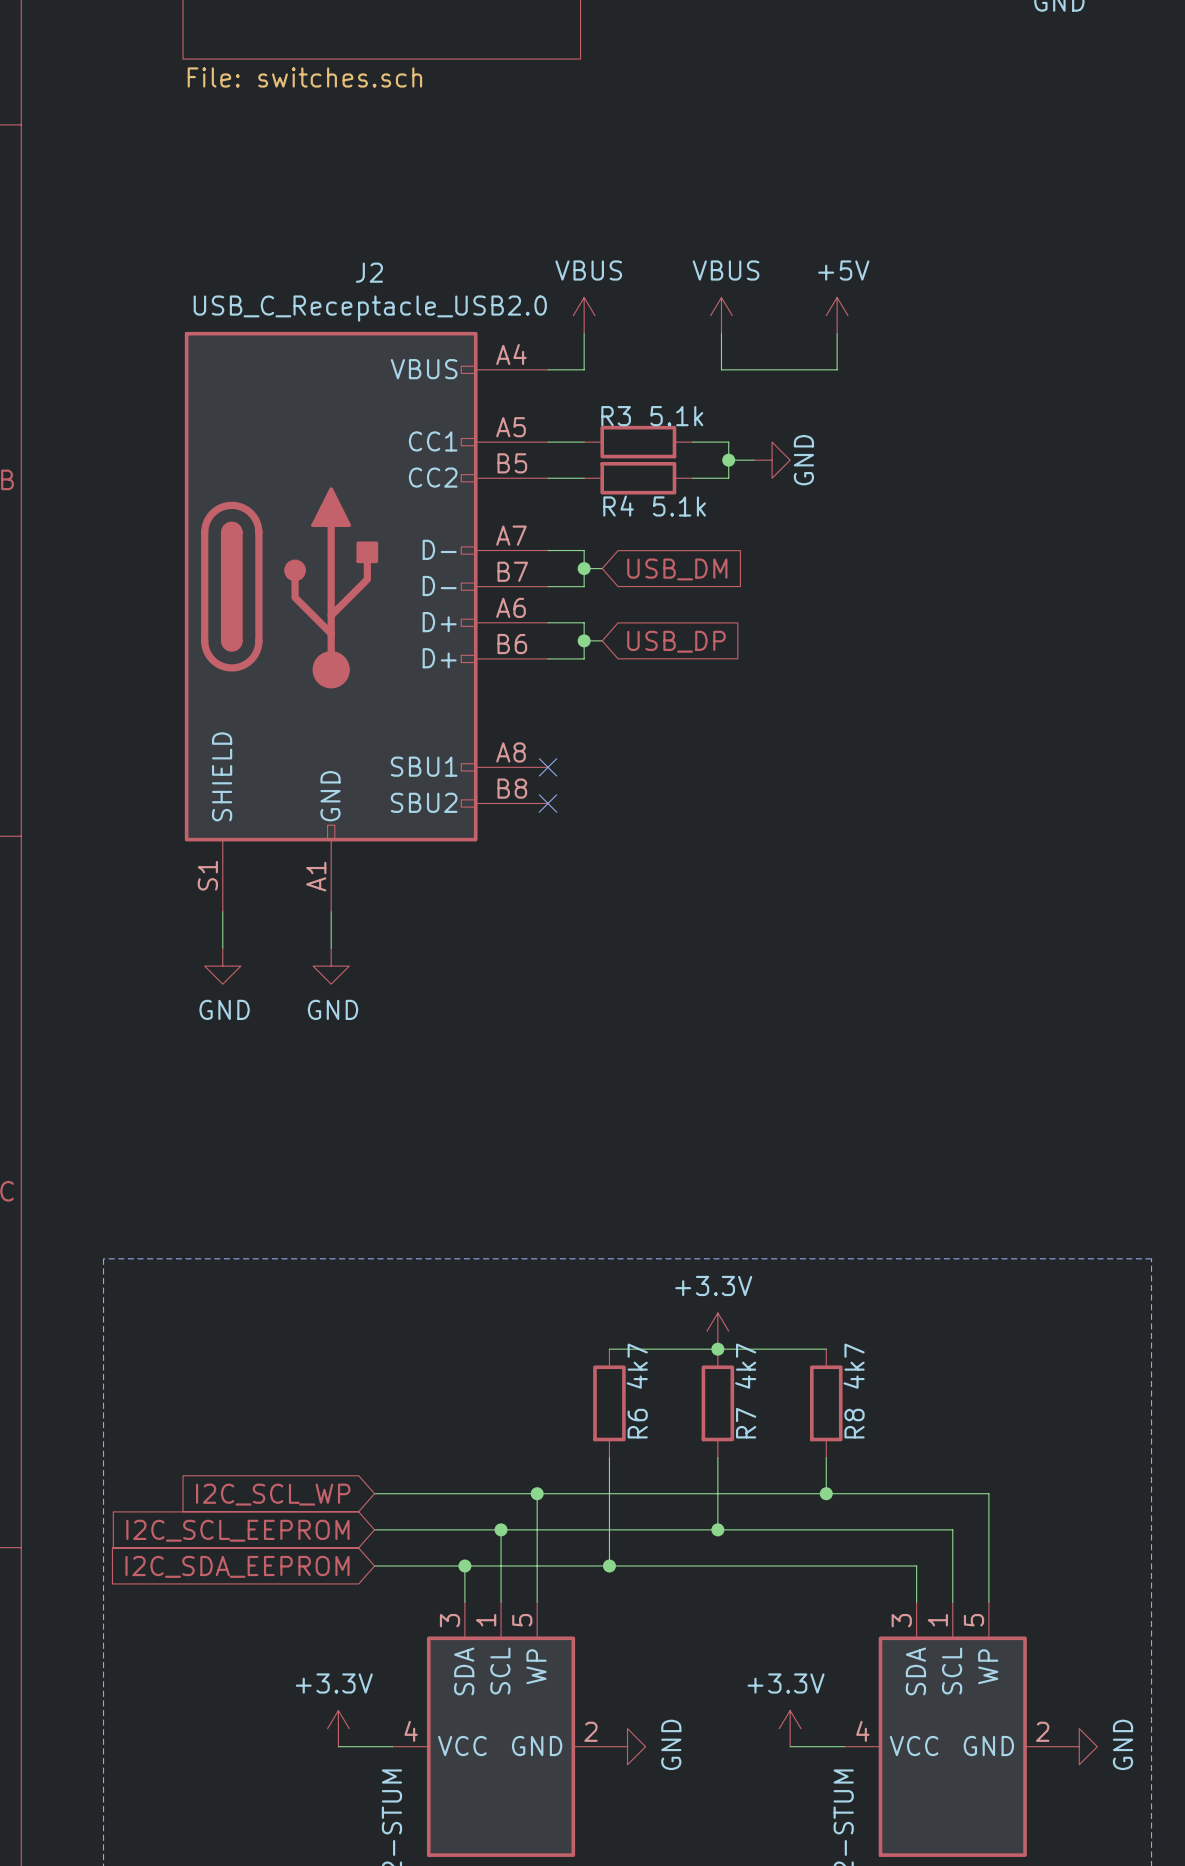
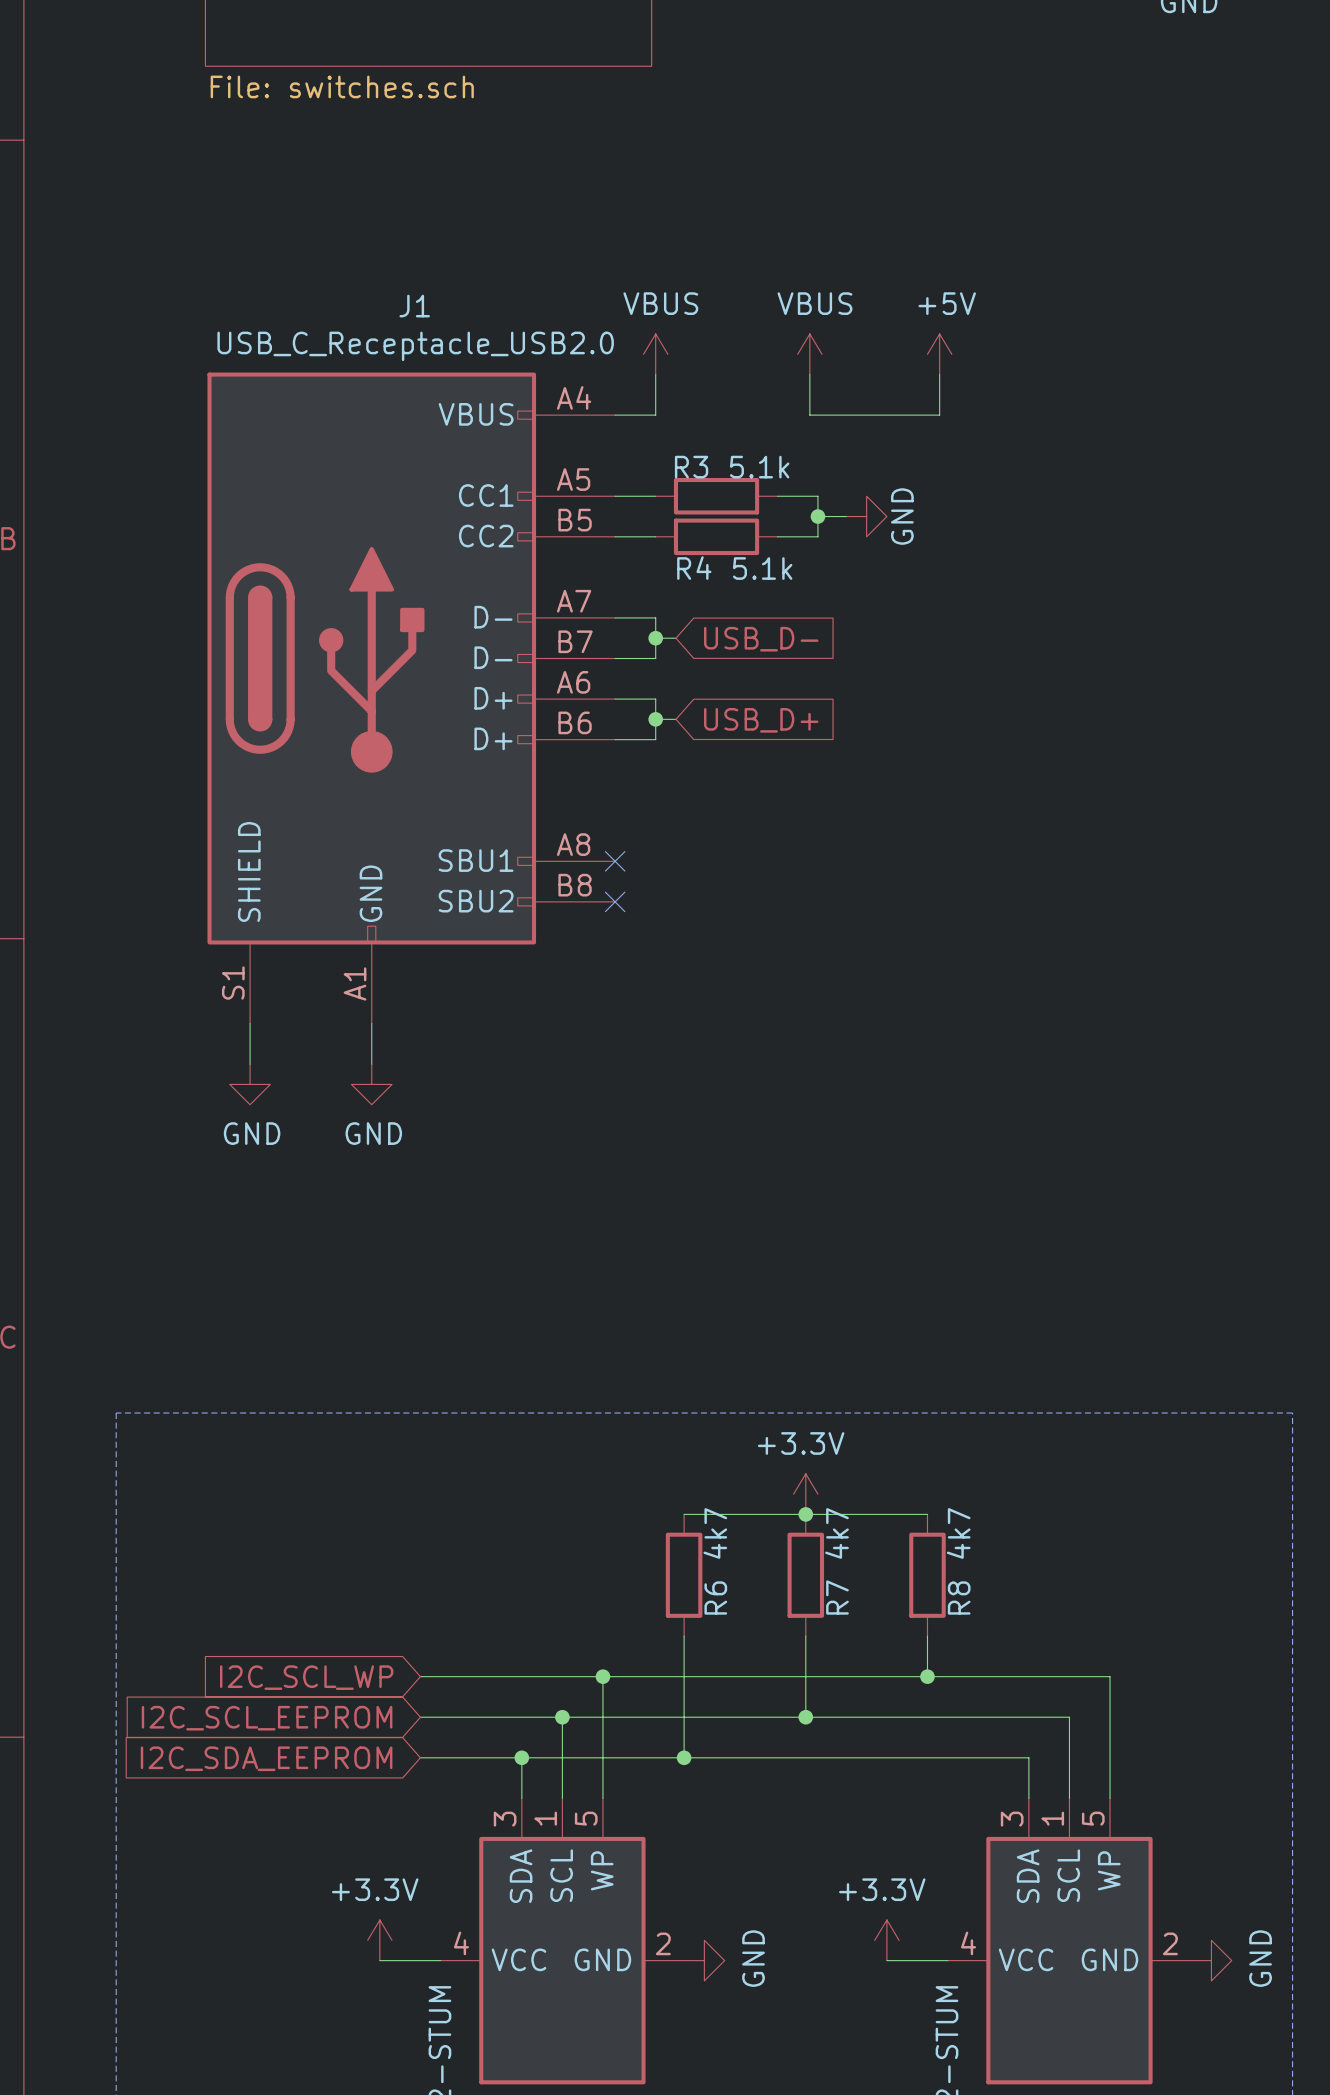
J2 name: J2 (369, 272) -> J1 (414, 306)
global label: USB_DM (677, 569) -> USB_D- (761, 639)
global label: USB_DP (676, 641) -> USB_D+ (761, 720)

